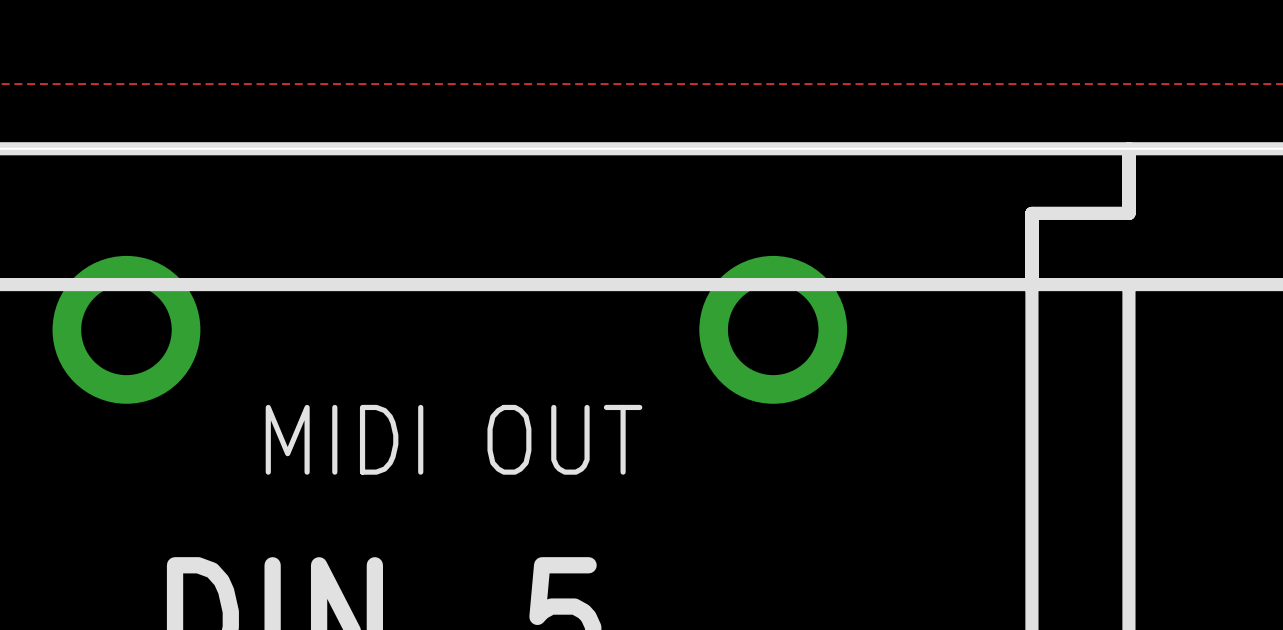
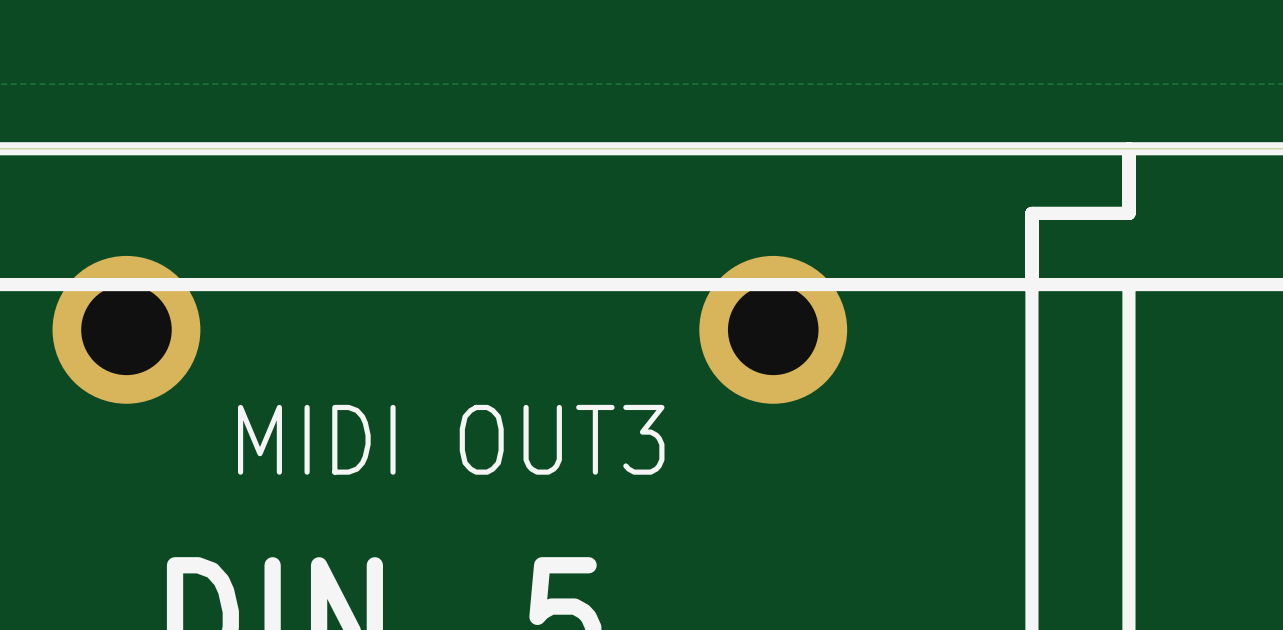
text: MIDI OUT (454, 439) -> MIDI OUT3 (451, 439)

